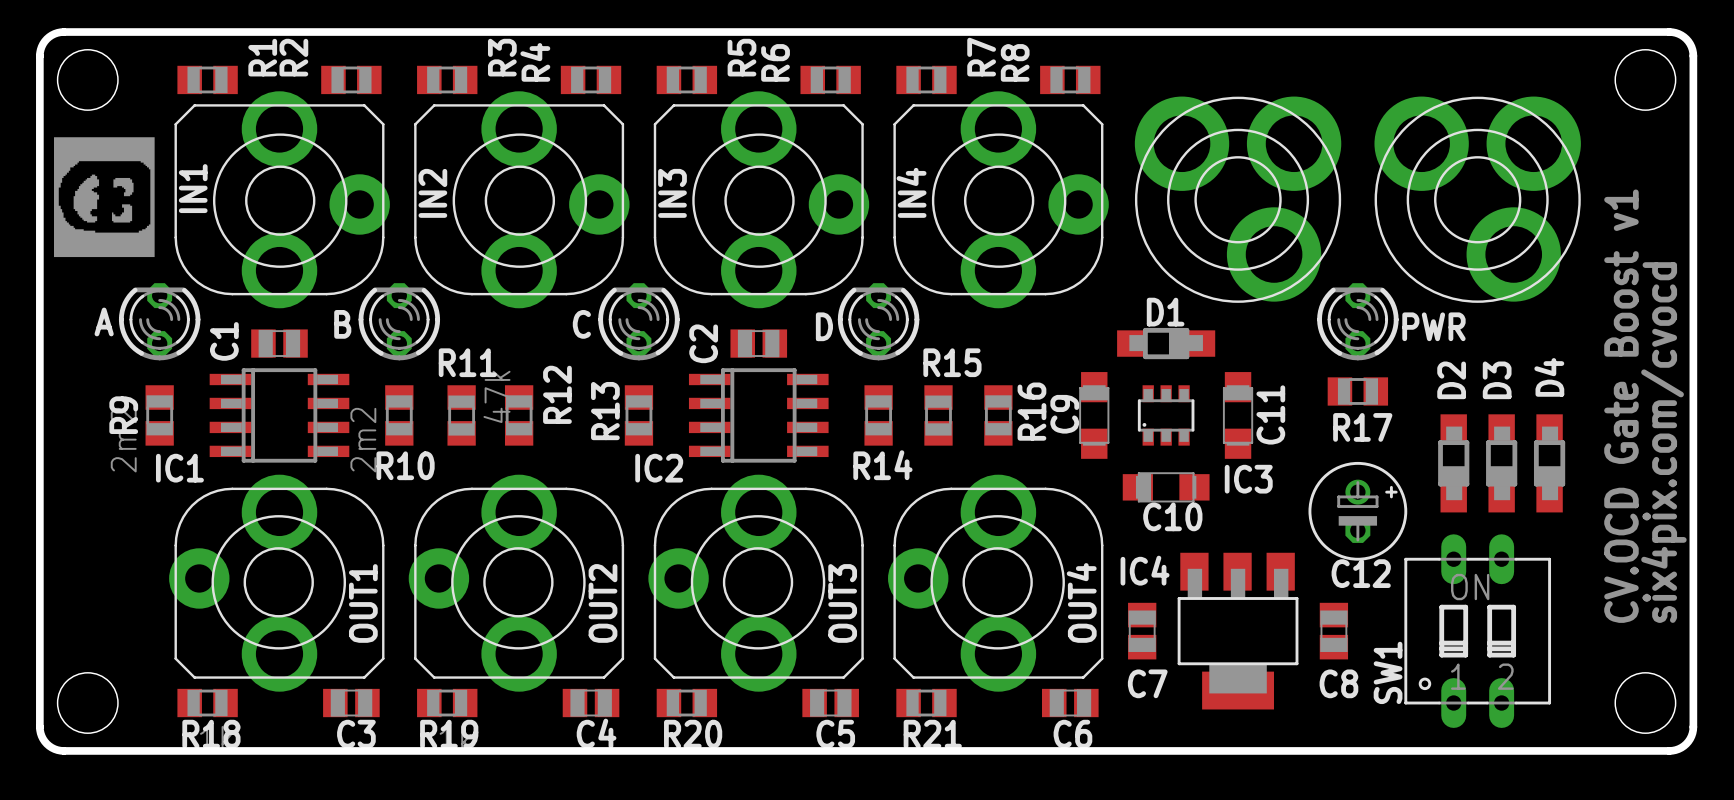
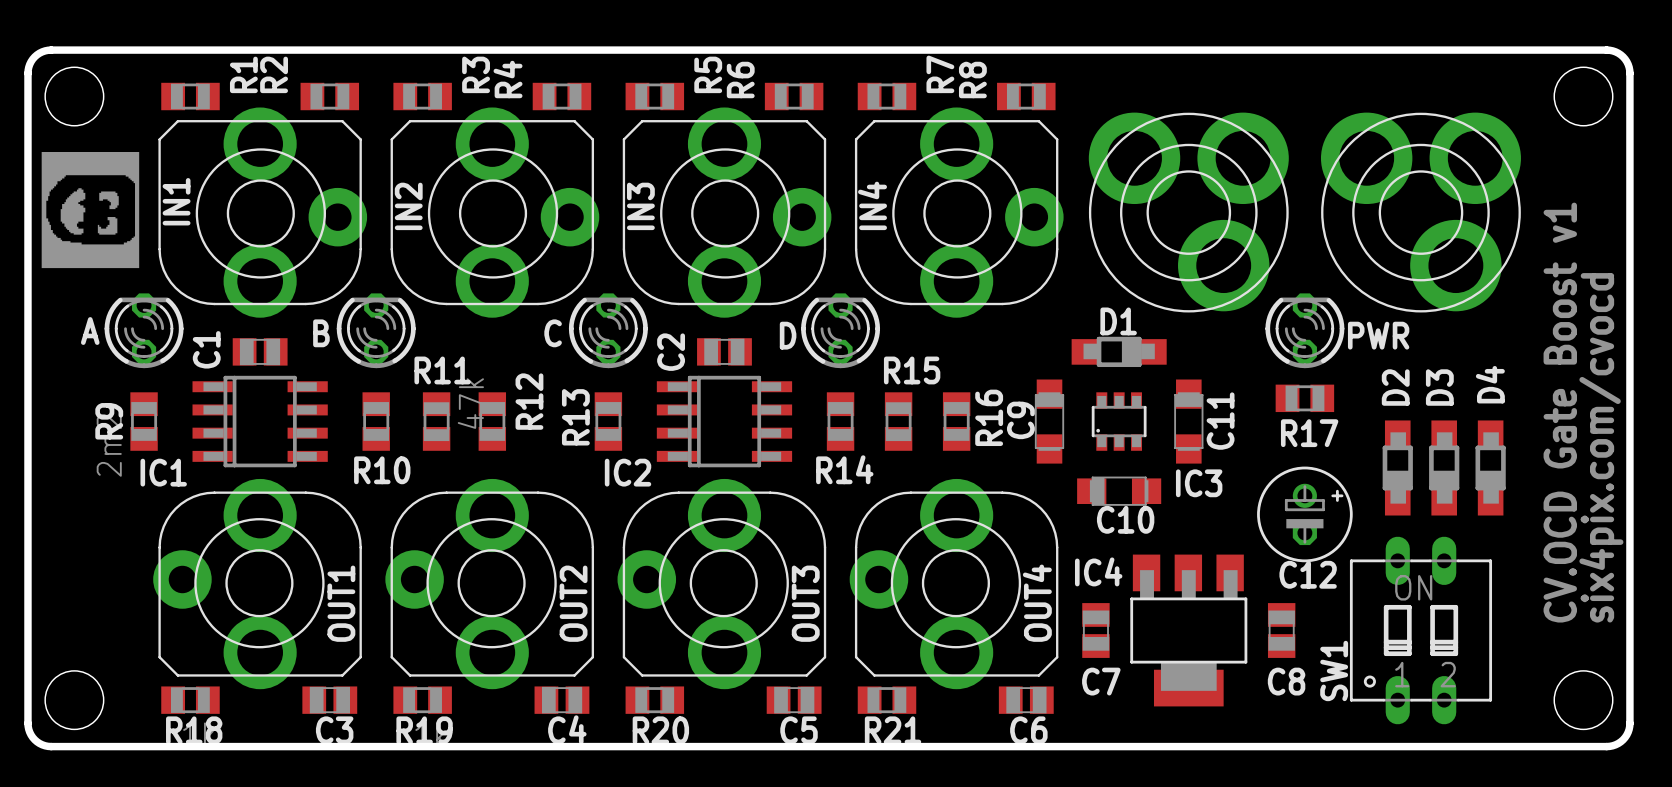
R10 value: 2m2 (363, 440) -> none

